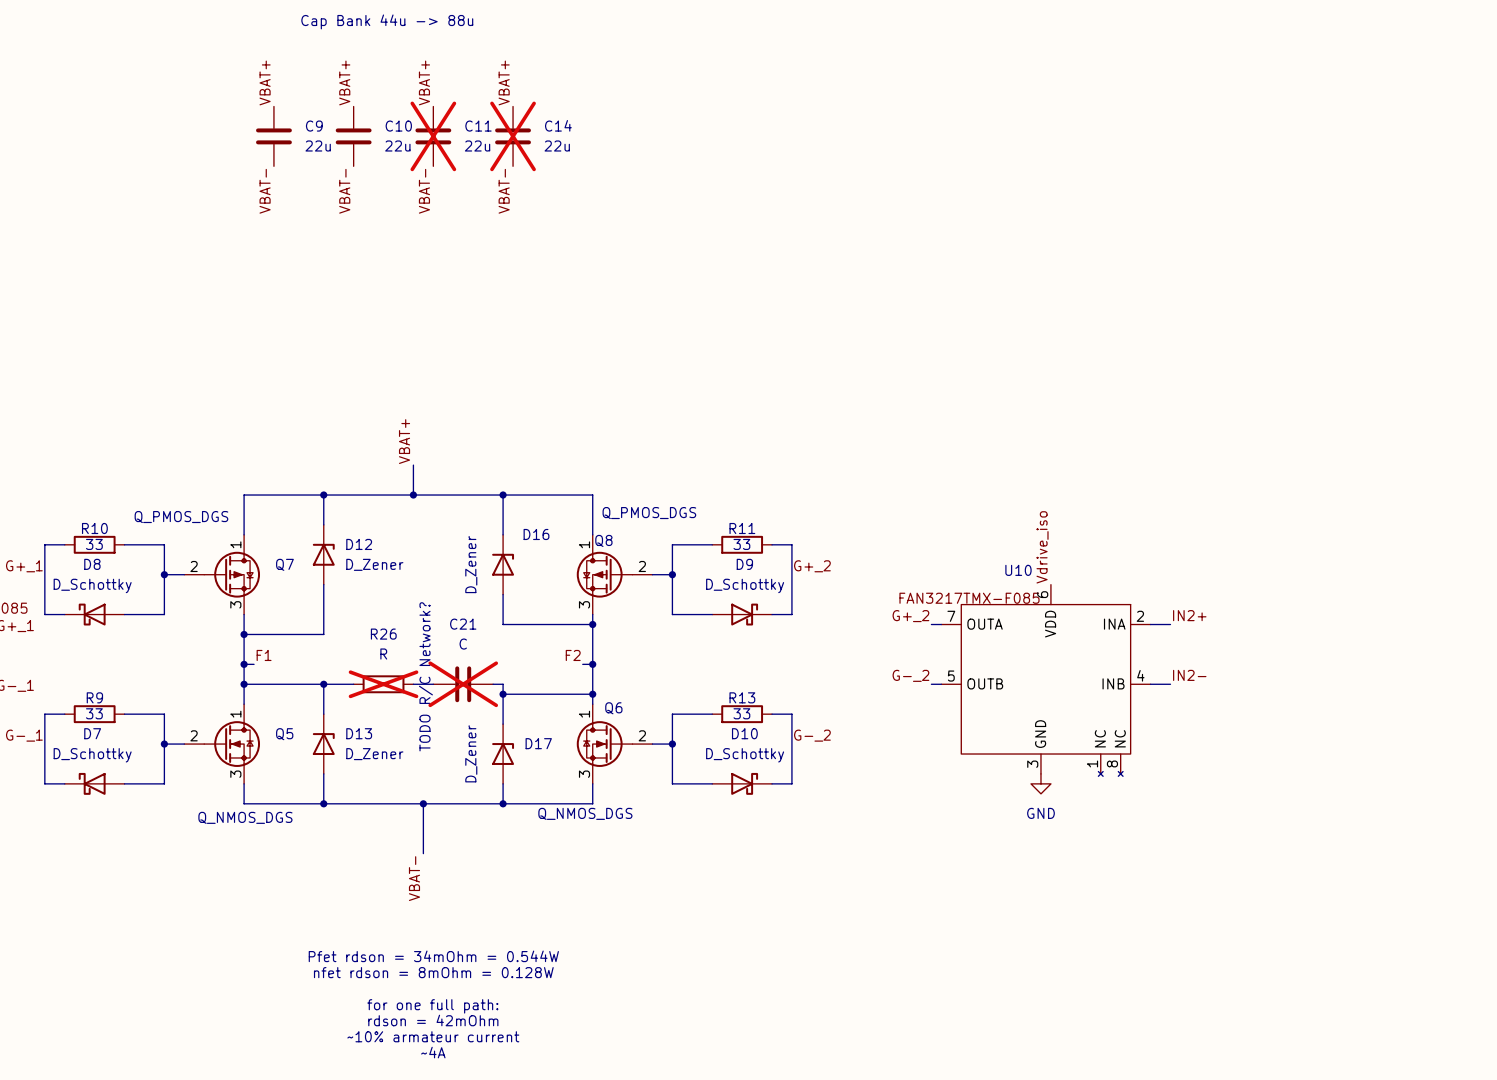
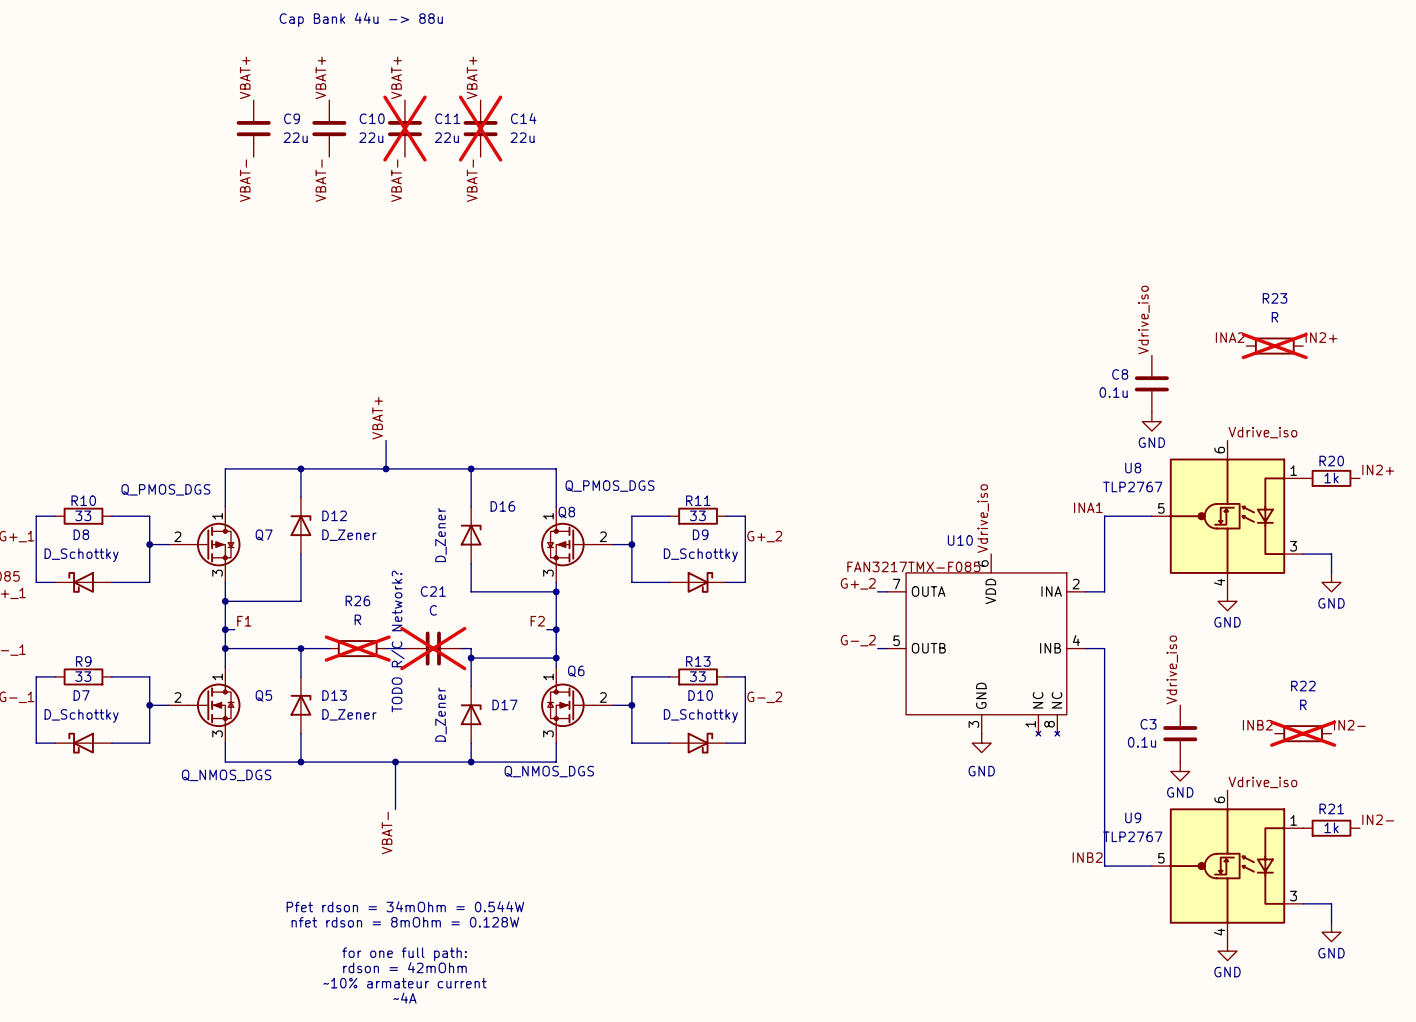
label: none -> Vdrive_iso (1143, 320)
label: none -> INA2 (1230, 337)
label: none -> IN2+ (1321, 337)
R23: none -> R (1274, 346)
C8: none -> 0.1u (1151, 383)
power symbol: none -> GND (1151, 421)
label: none -> Vdrive_iso (1262, 432)
label: none -> IN2+ (1378, 469)
R20: none -> 1k (1331, 478)
label: none -> INA1 (1088, 507)
wire: none -> (1151, 516) (1104, 516) (1104, 591)
U8: none -> TLP2767 (1227, 516)
wire: none -> (1303, 554) (1331, 554) (1331, 572)
power symbol: none -> GND (1331, 582)
label: IN2+ (1189, 615) -> none
power symbol: none -> GND (1227, 601)
label: IN2- (1189, 675) -> none
wire: none -> (1104, 648) (1104, 866) (1151, 866)
label: none -> Vdrive_iso (1172, 669)
label: none -> INB2 (1257, 725)
label: none -> IN2- (1349, 725)
C3: none -> 0.1u (1180, 733)
R22: none -> R (1303, 733)
power symbol: none -> GND (1180, 771)
label: none -> Vdrive_iso (1262, 782)
label: none -> IN2- (1378, 819)
R21: none -> 1k (1331, 828)
label: none -> INB2 (1087, 857)
U9: none -> TLP2767 (1227, 866)
wire: none -> (1303, 903) (1331, 903) (1331, 922)
power symbol: none -> GND (1331, 932)
power symbol: none -> GND (1227, 951)

